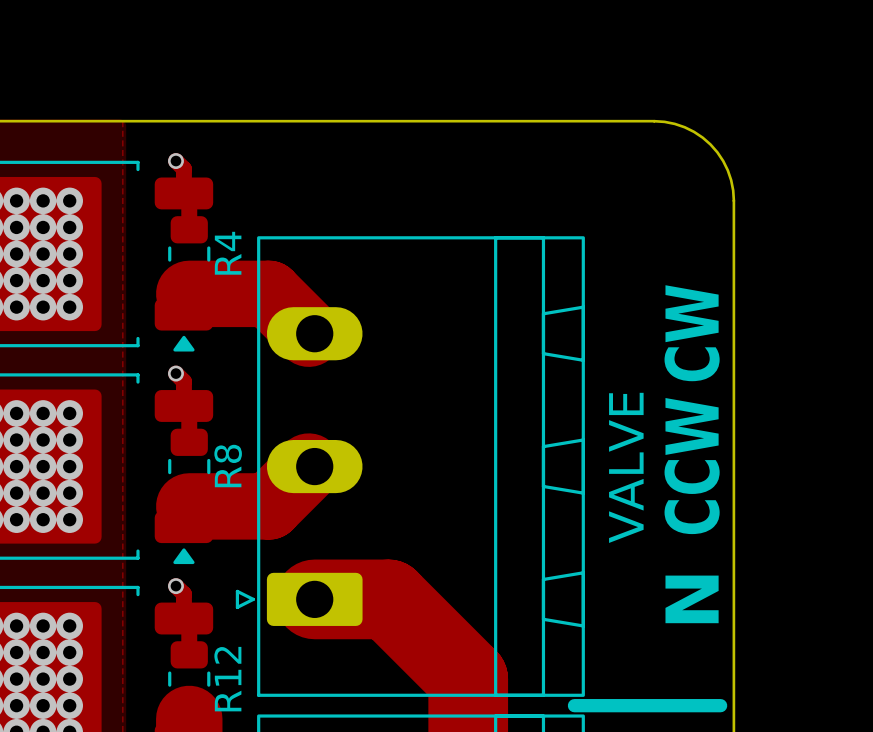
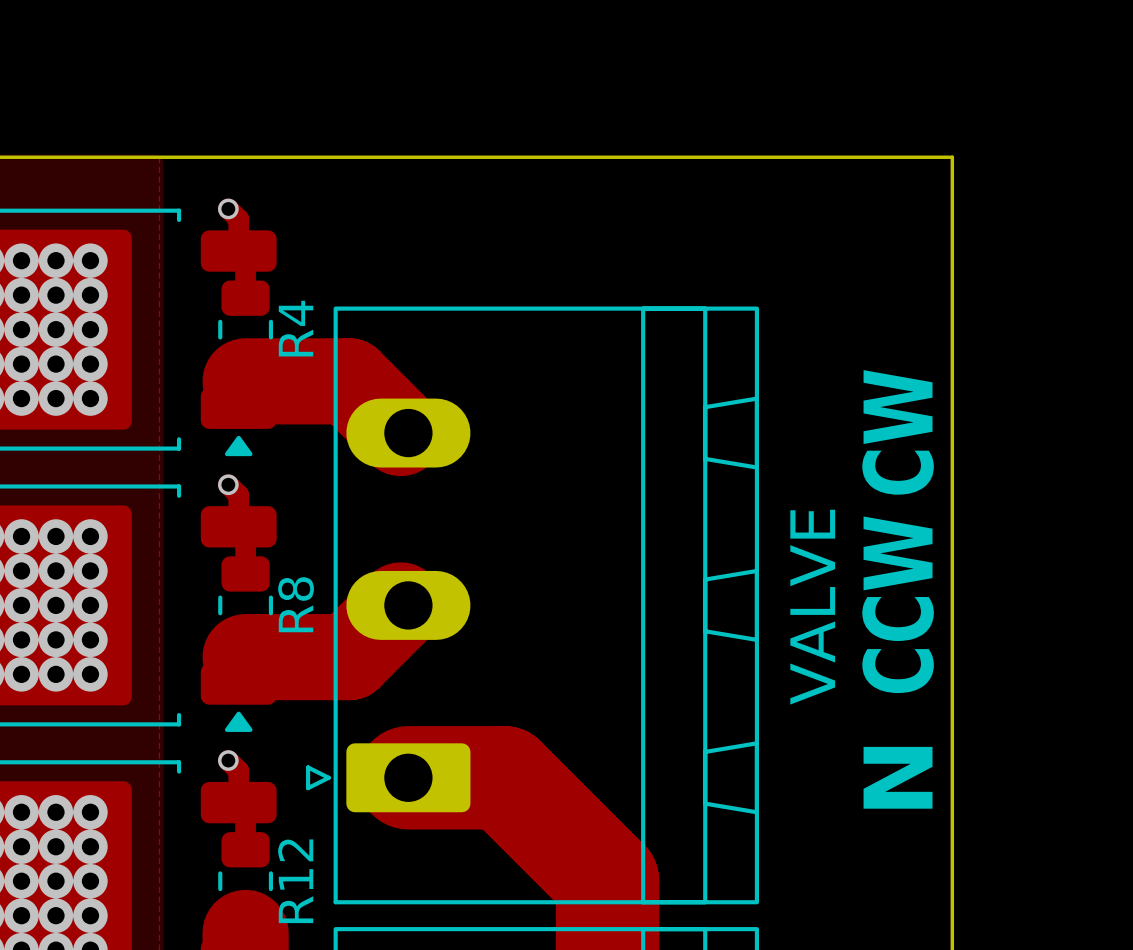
board edge: (654, 121) (684, 127) (710, 144) (727, 170) (733, 200) -> (848, 157) (952, 157) (952, 260)
line: (574, 705) (720, 705) -> none

